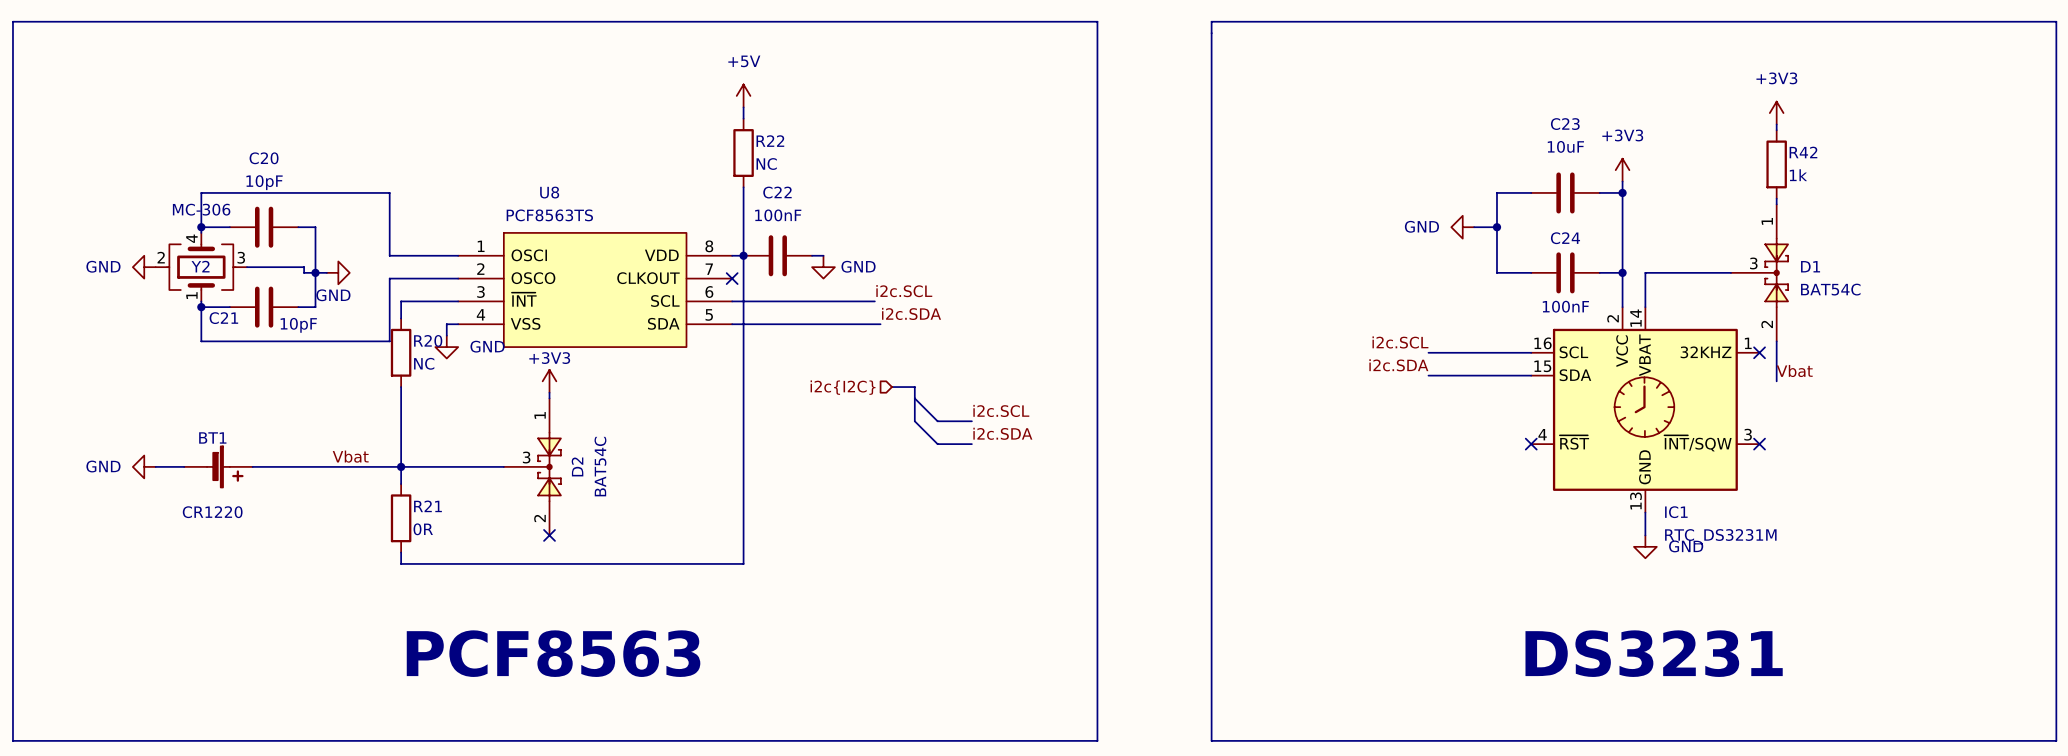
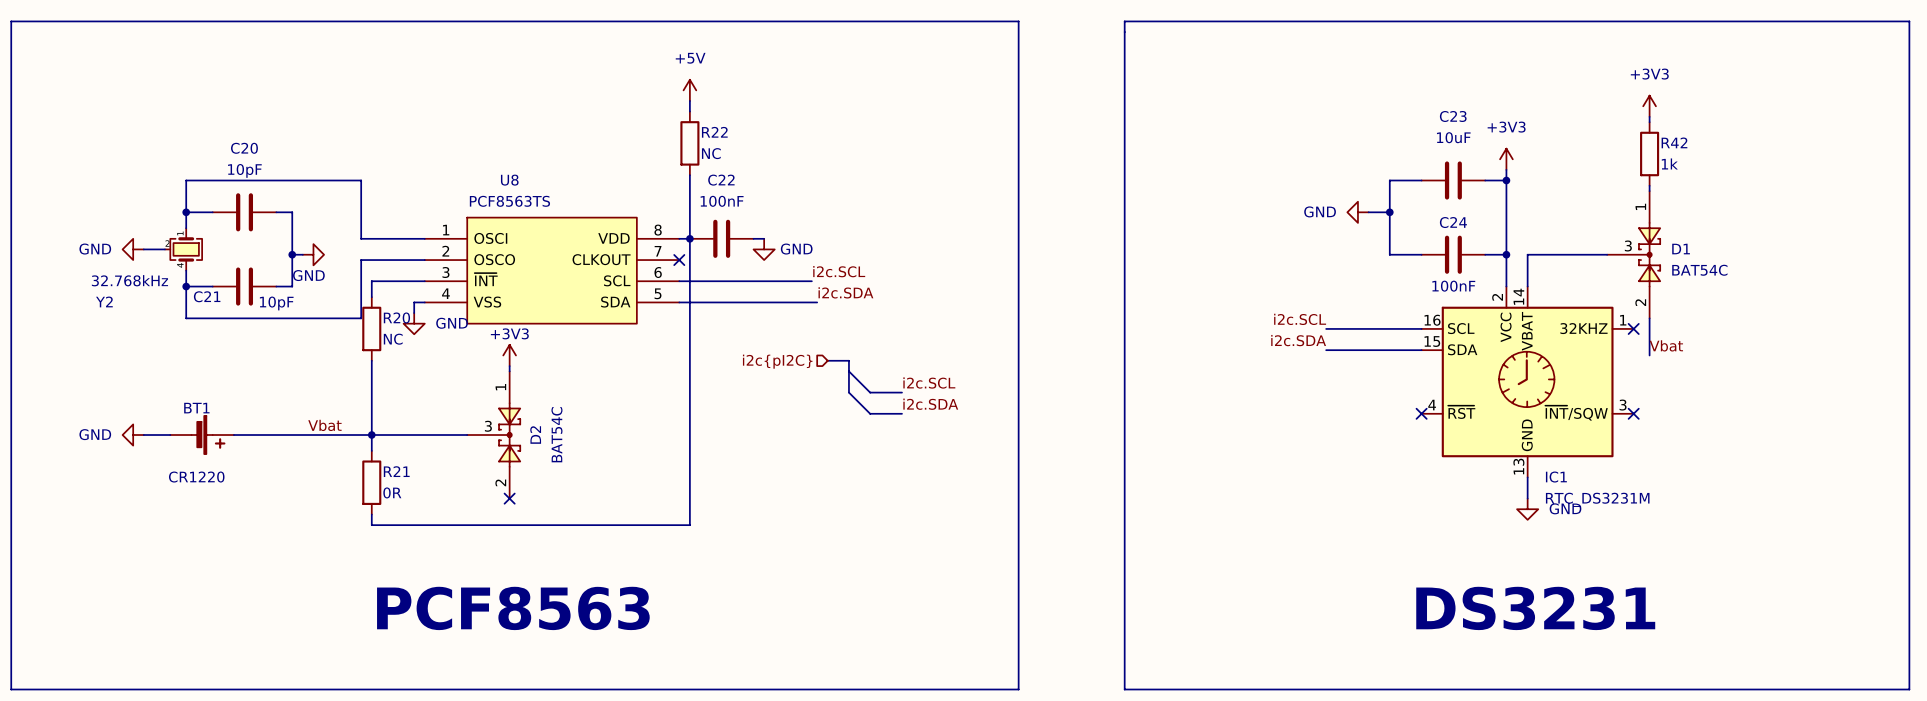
Y2 value: MC-306 (201, 209) -> 32.768kHz (129, 280)
Y2 symbol: [155, 232, 248, 302] -> [165, 228, 203, 271]
Y2 name position: Y2 (200, 266) -> Y2 (104, 301)
wire: (247, 267) (304, 267) (304, 272) (315, 272) -> none
hierarchical label: i2c{I2C} (843, 387) -> i2c{pI2C} (777, 361)

